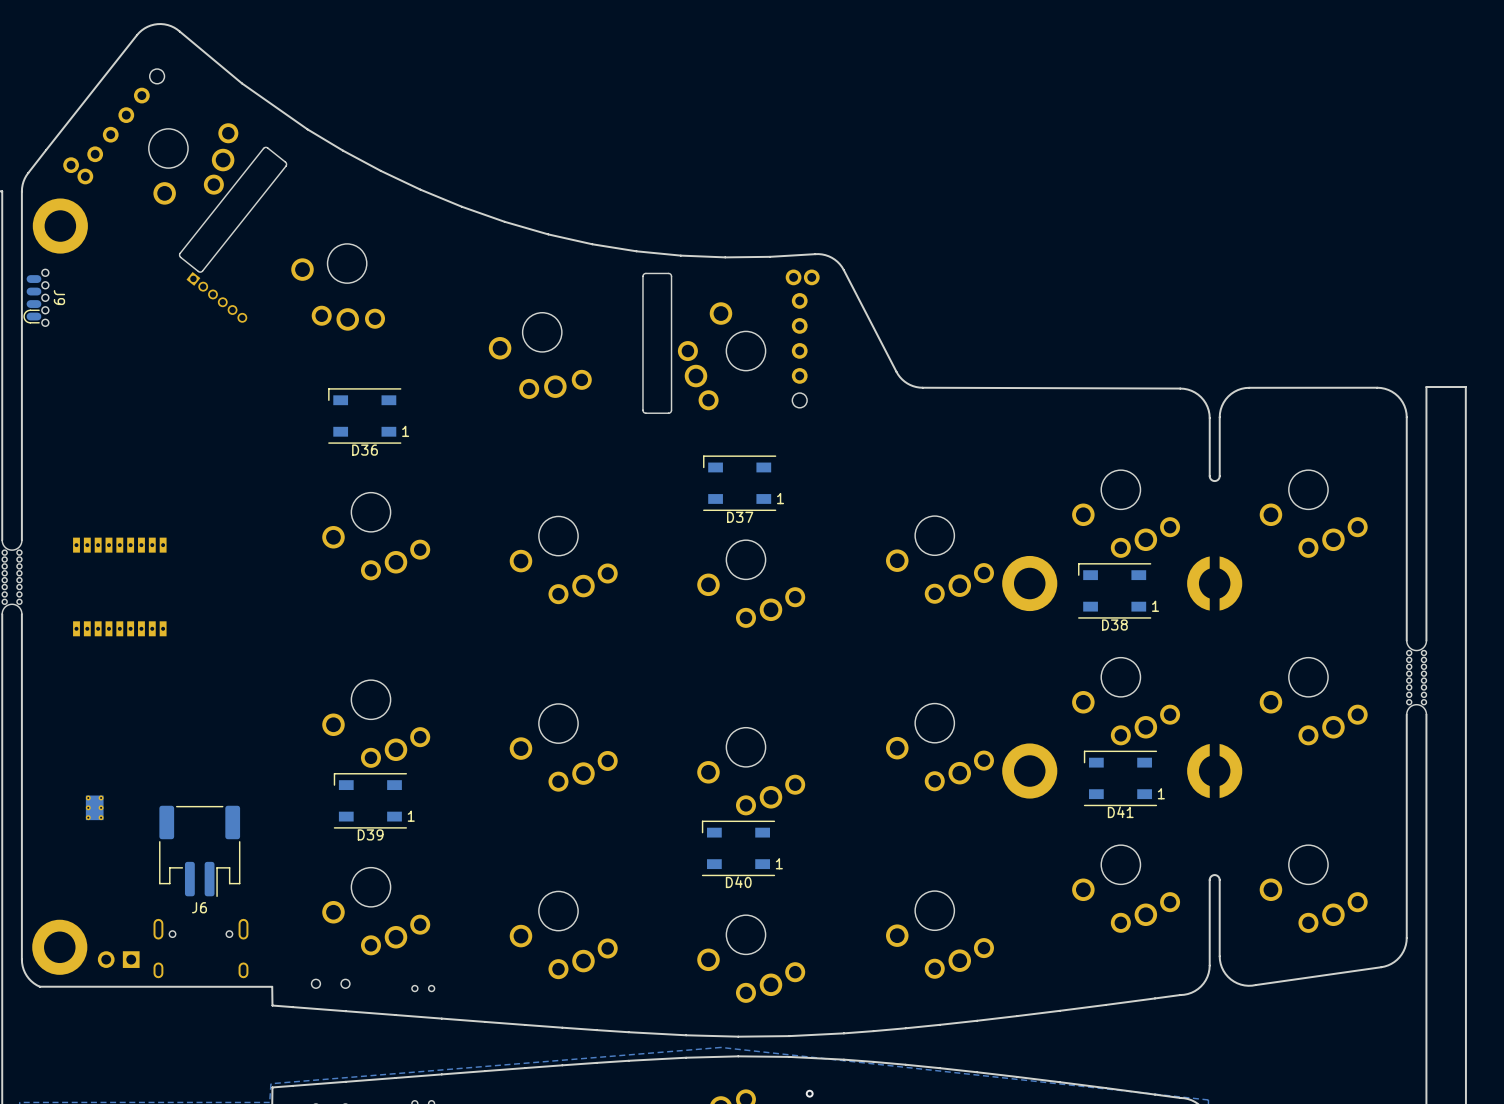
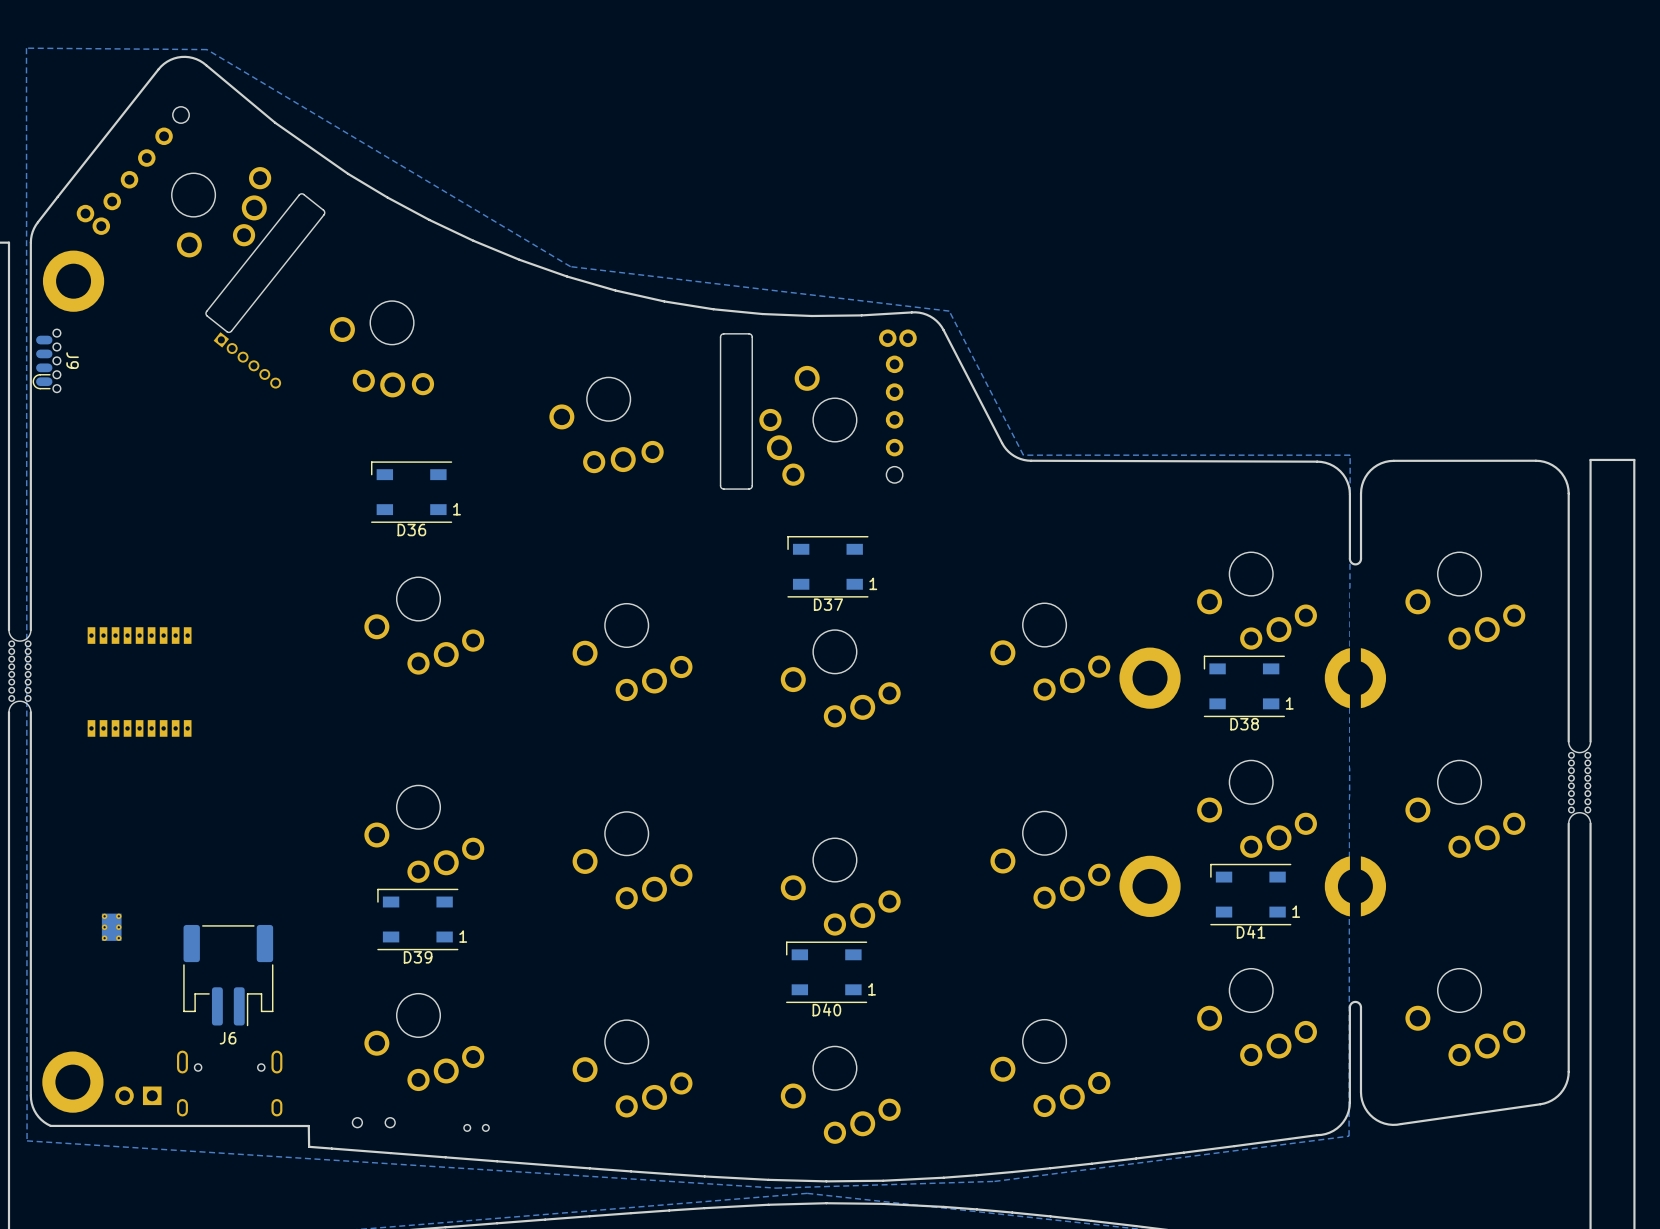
zone outline: none -> (26, 48) (206, 49) (570, 266) (949, 311) (1023, 455) (1350, 455) (1349, 1136) (994, 1181) (776, 1188) (27, 1140) (26, 48)

